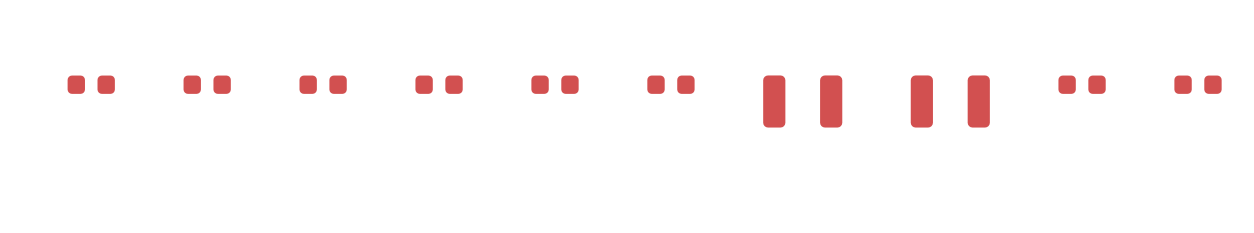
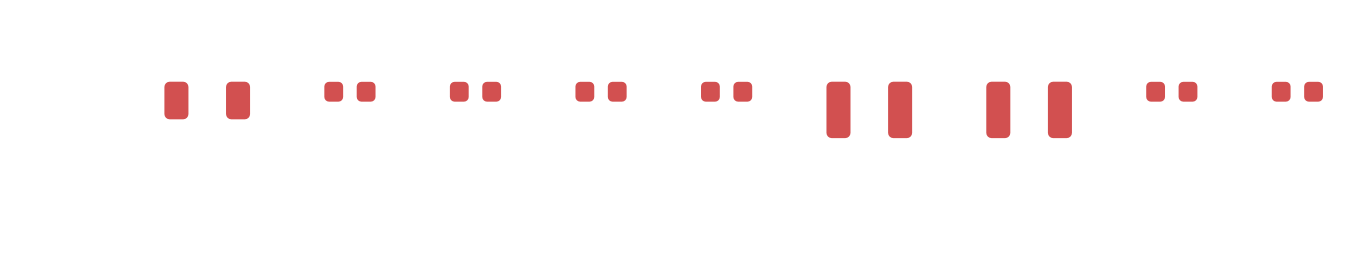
part footprint: [183, 75, 231, 94] -> [164, 81, 251, 120]
part: (91, 84) -> none

